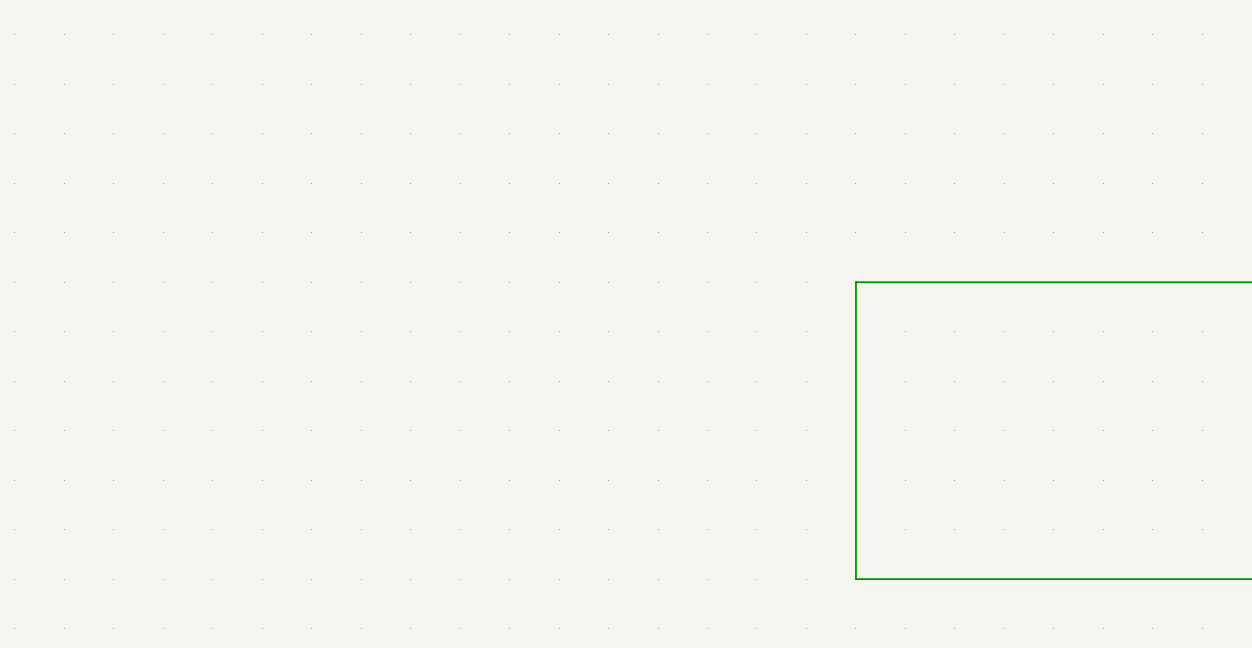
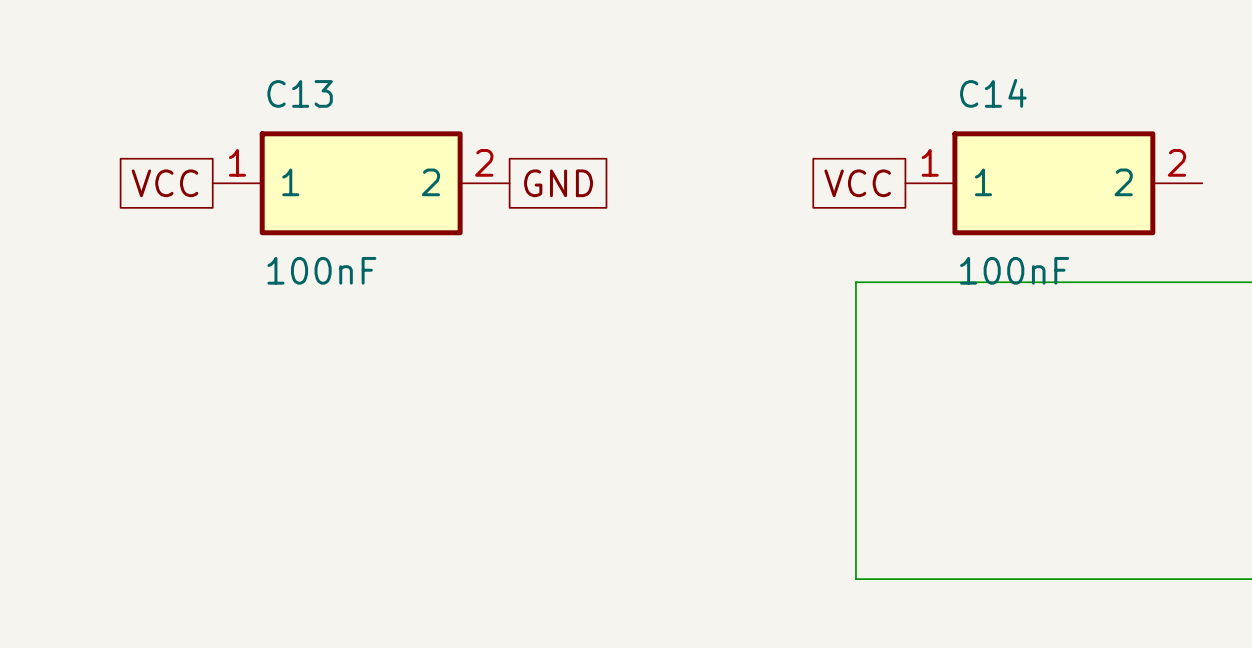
global label: none -> VCC (164, 183)
C13: none -> 100nF (361, 183)
global label: none -> GND (558, 183)
global label: none -> VCC (857, 183)
C14: none -> 100nF (1053, 183)

